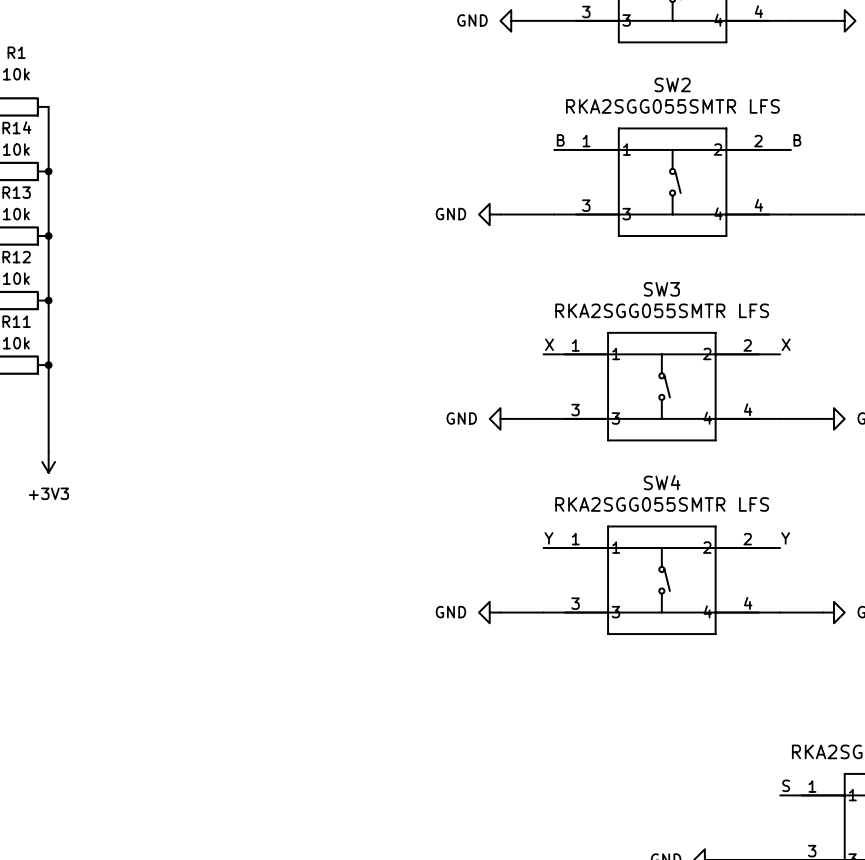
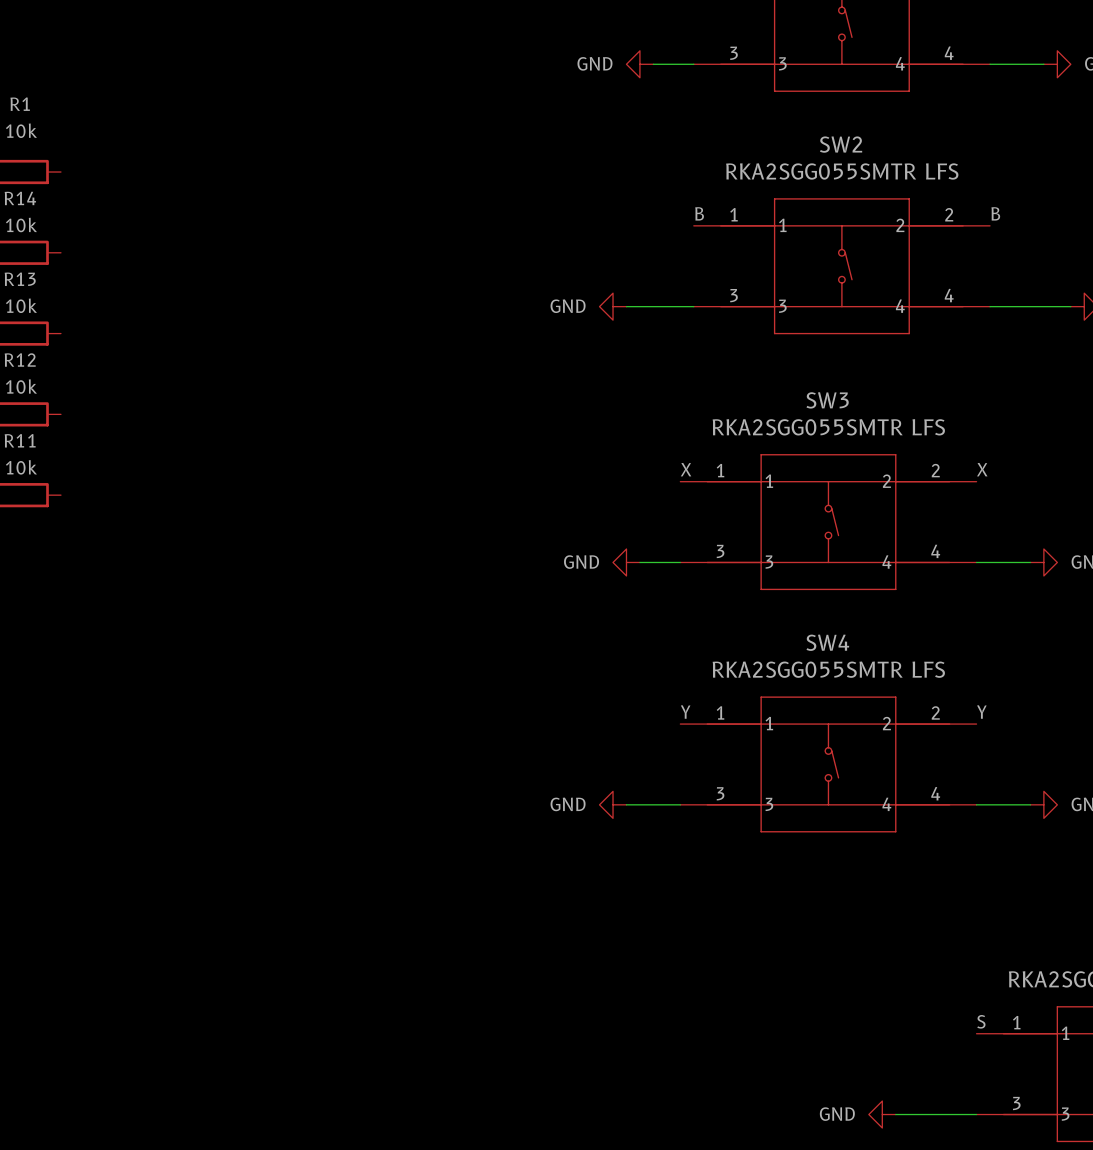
wire: (48, 106) (48, 451) -> none
junction: (48, 171) -> none
junction: (48, 236) -> none
junction: (48, 300) -> none
junction: (48, 365) -> none
power symbol: +3V3 (48, 461) -> none

